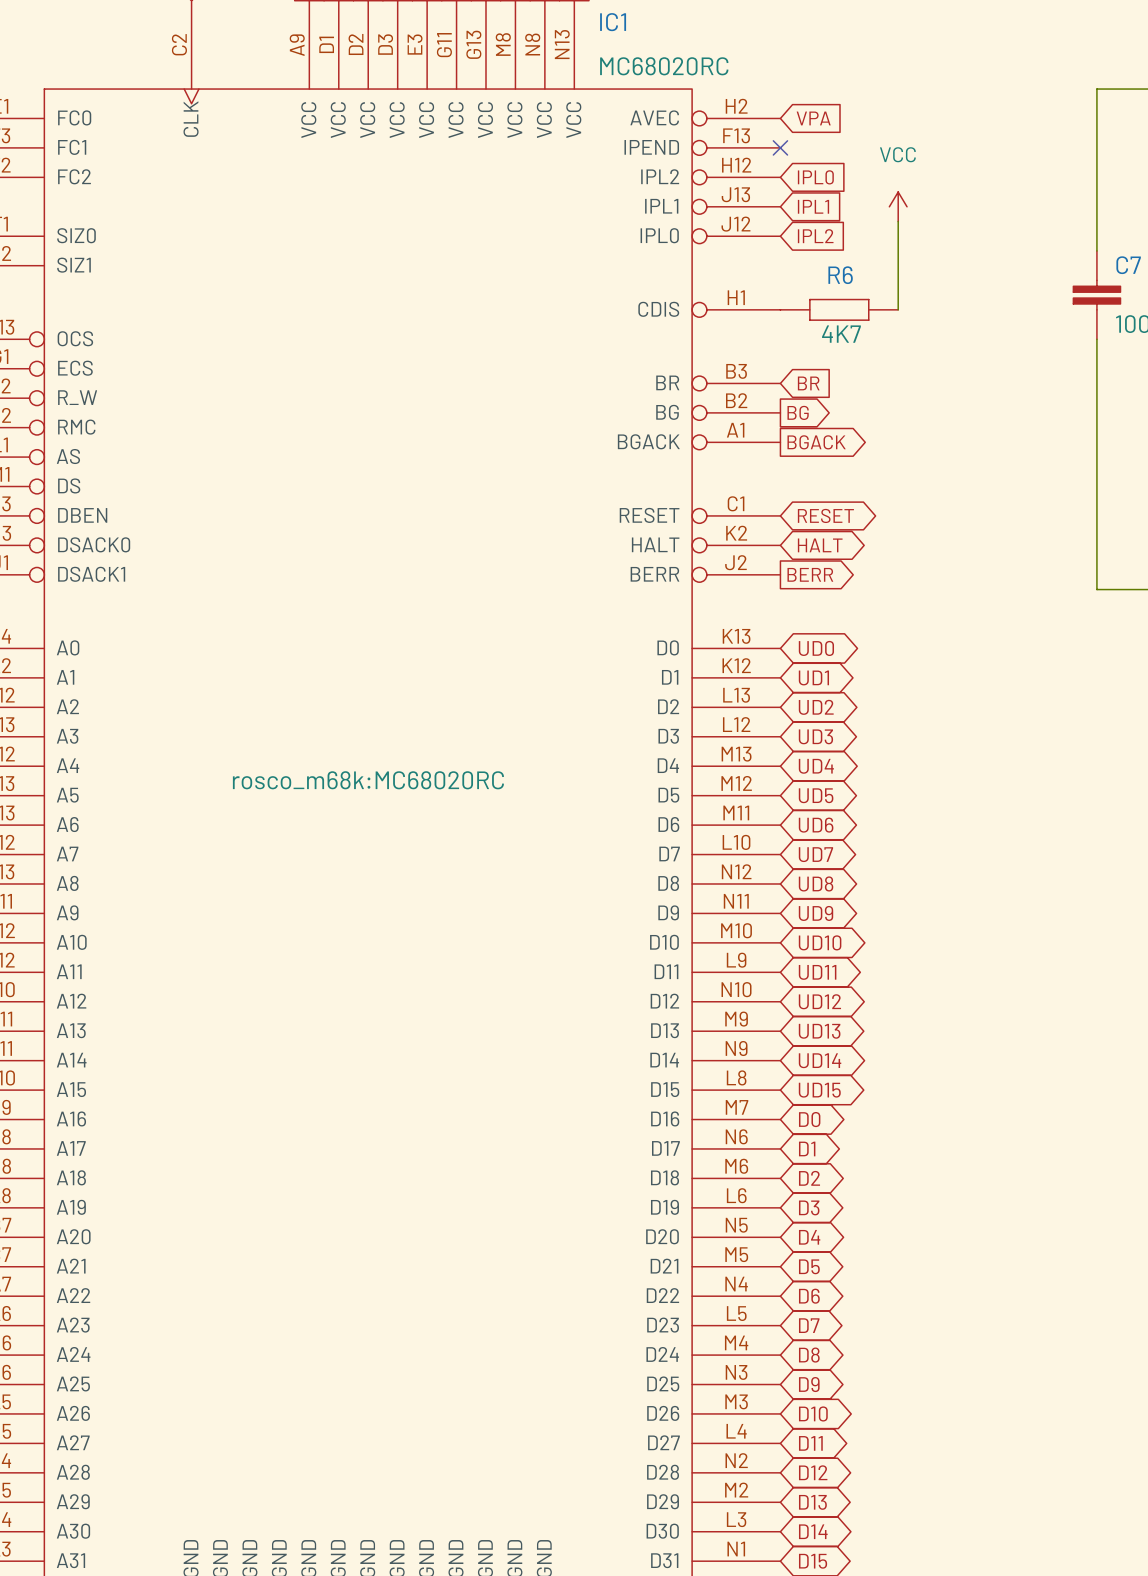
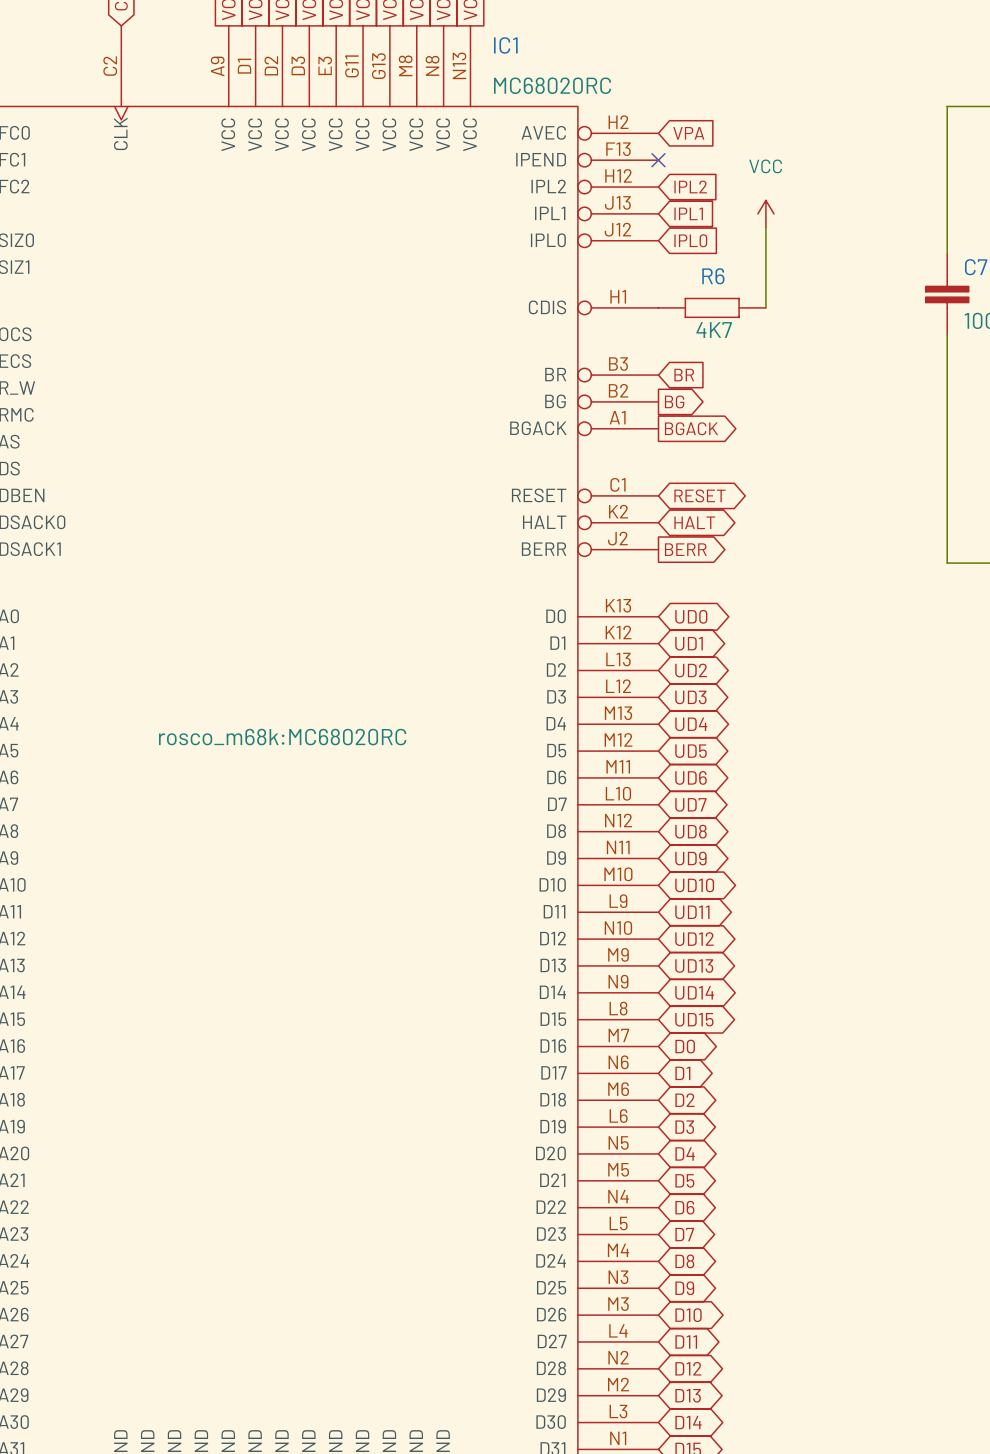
global label: IPL0 (815, 177) -> IPL2 (690, 186)
global label: IPL2 (815, 236) -> IPL0 (690, 240)

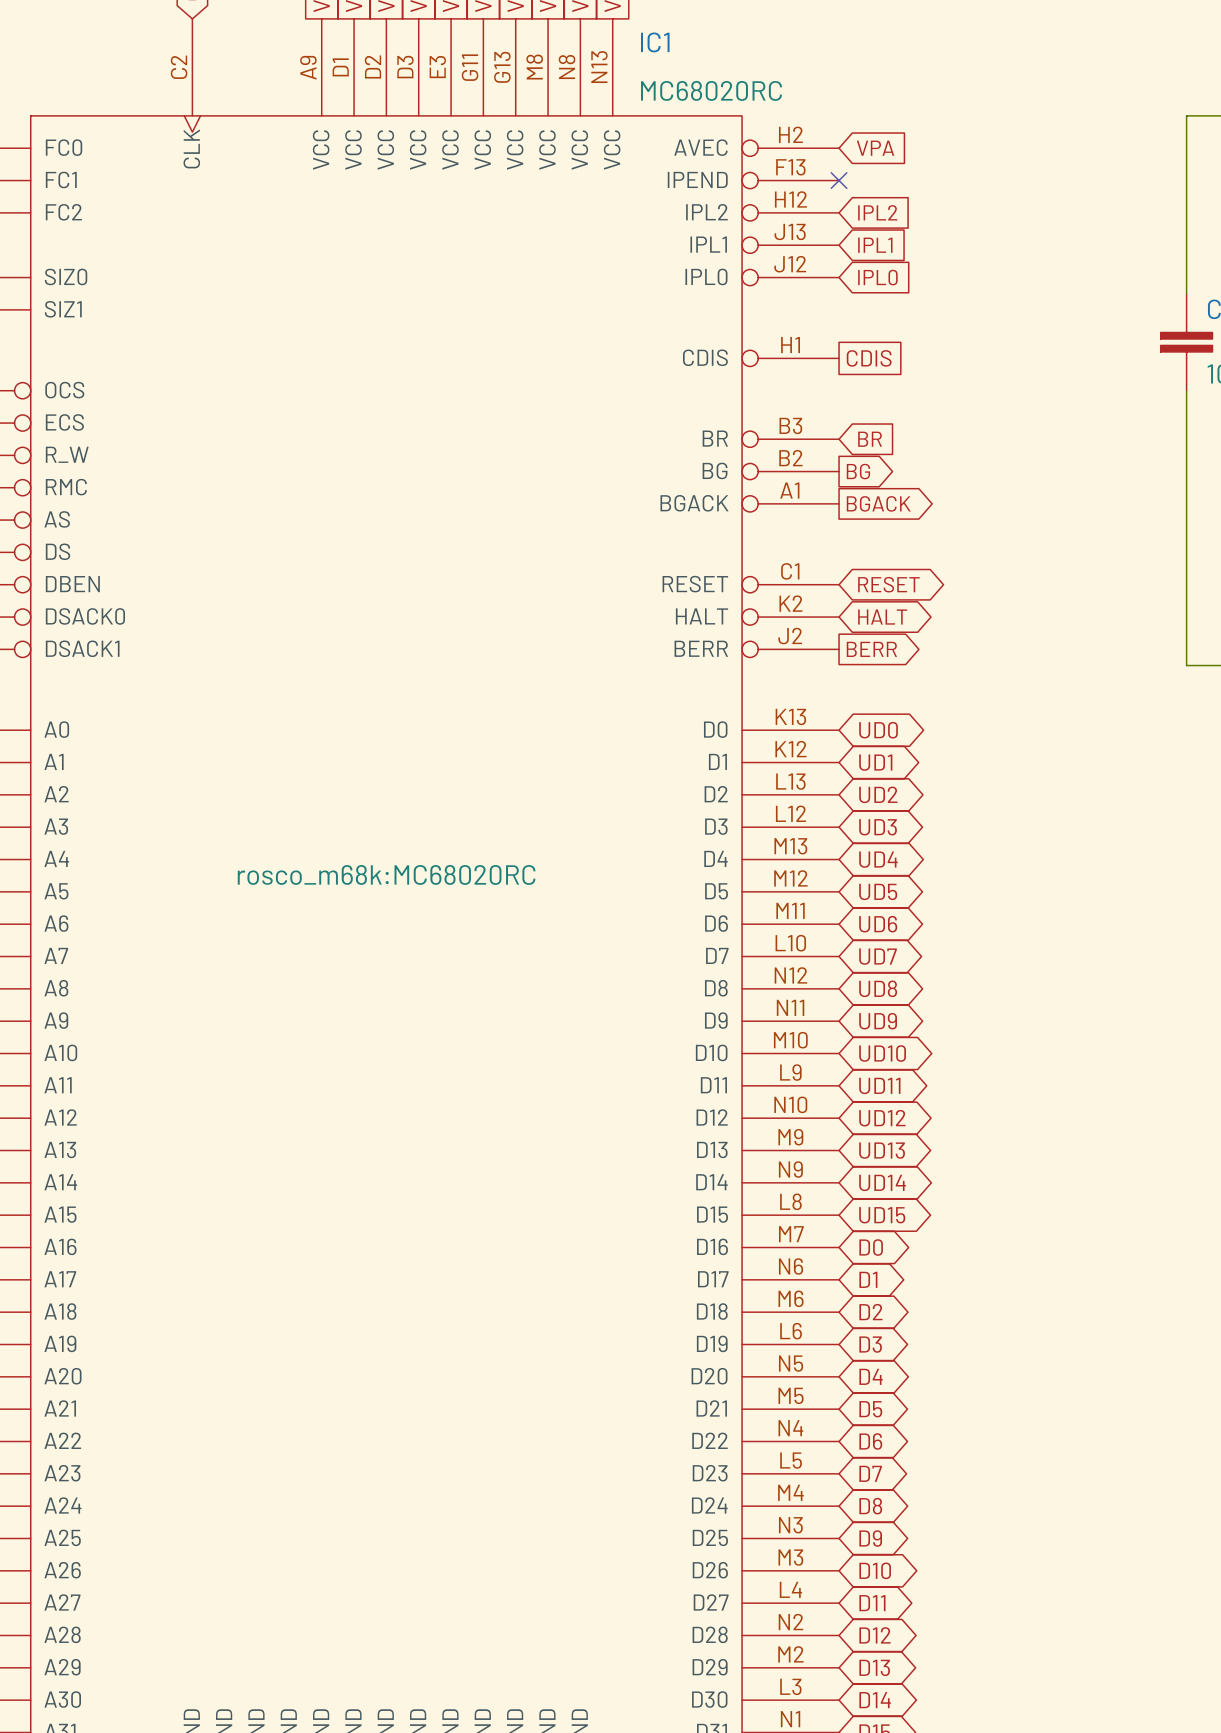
power symbol: VCC (765, 213) -> none
wire: (765, 227) (765, 307) -> none
global label: none -> CDIS (869, 358)
R6: 4K7 (712, 307) -> none

